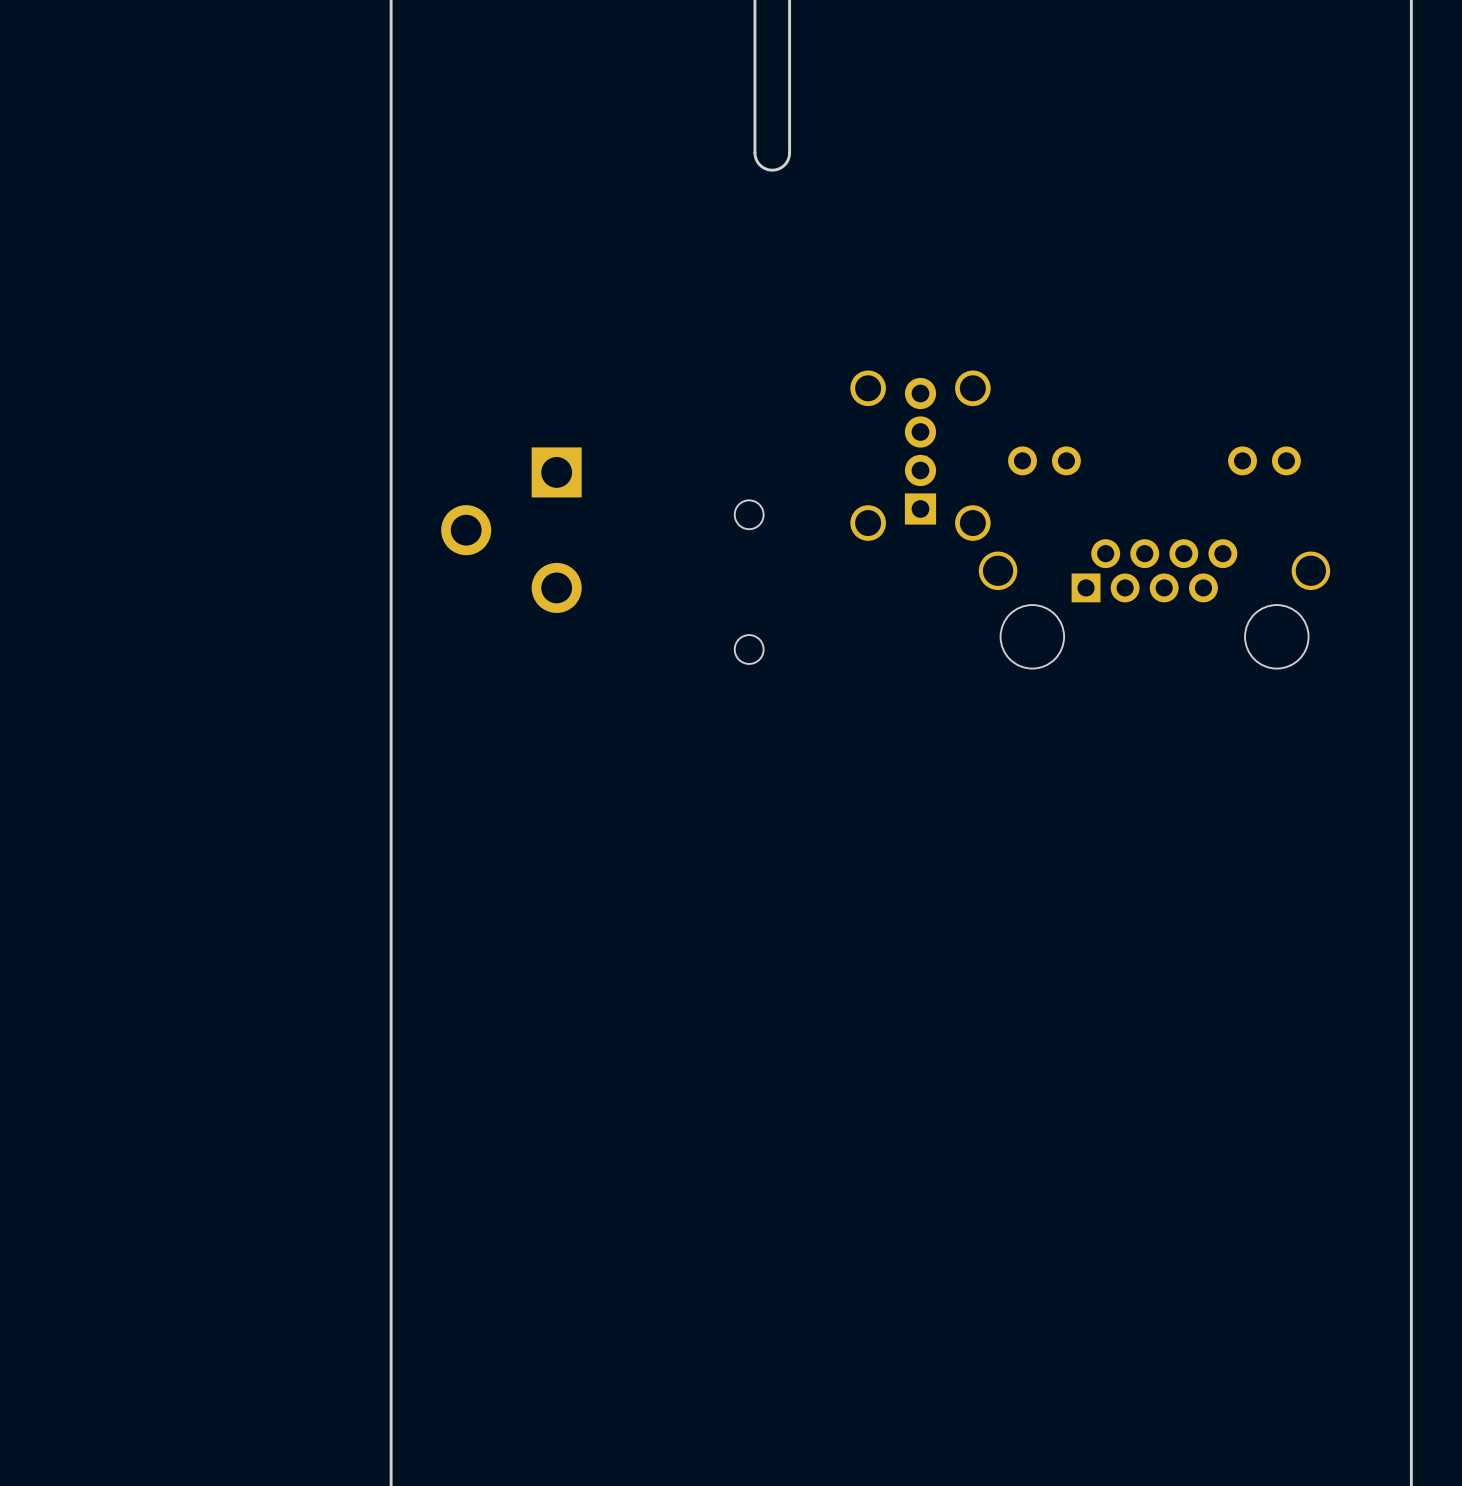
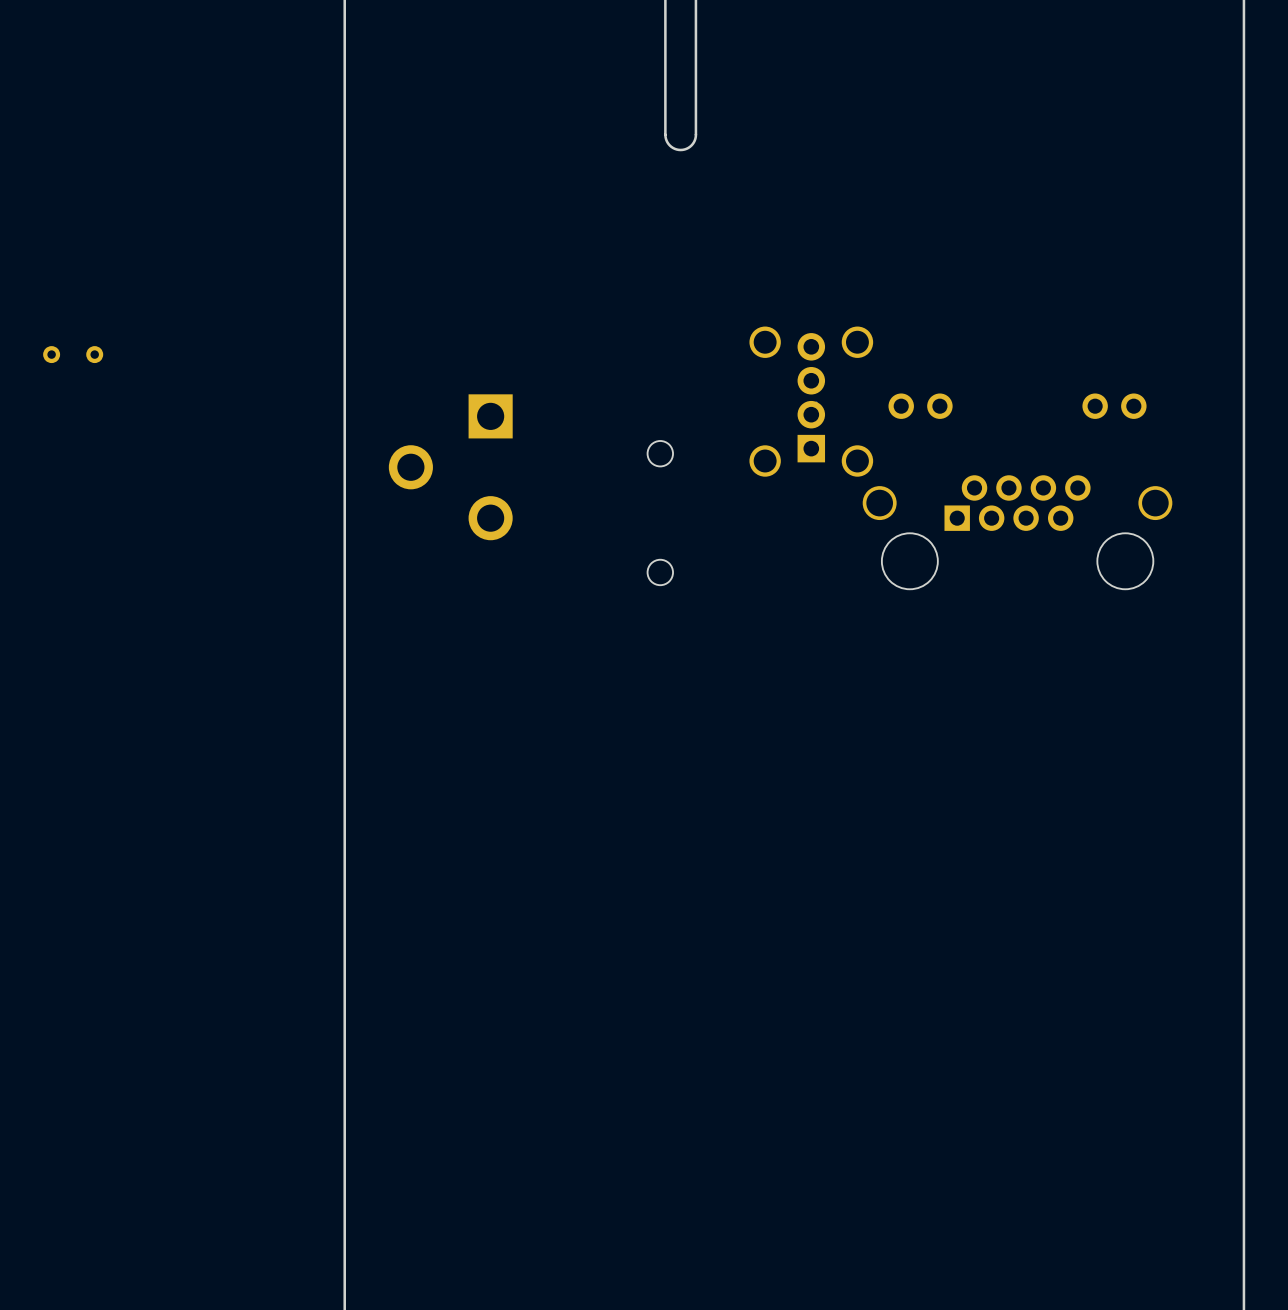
part: none -> (73, 354)

